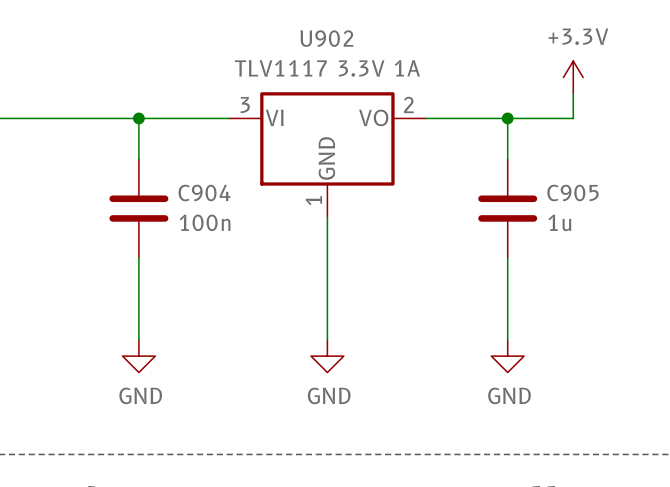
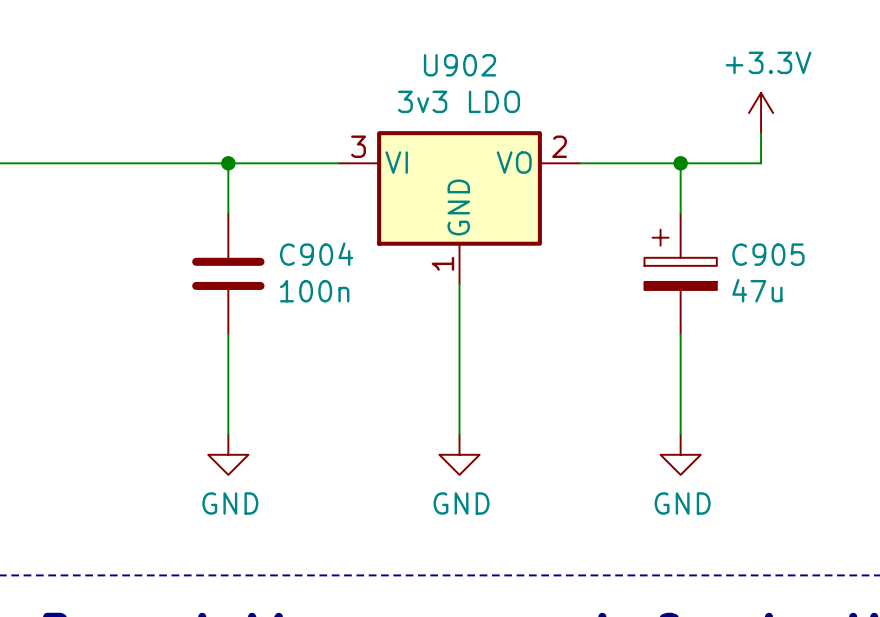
U902 value: TLV1117 3.3V 1A (327, 68) -> 3v3 LDO (459, 101)
C905 symbol: [478, 159, 538, 258] -> [644, 213, 717, 335]
C905 value: 1u (559, 222) -> 47u (757, 290)

